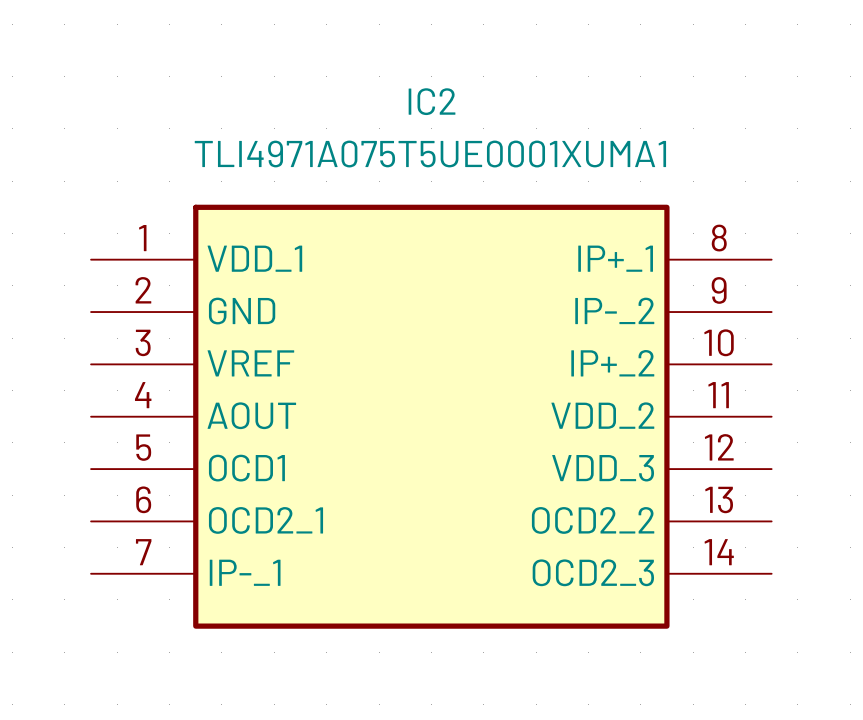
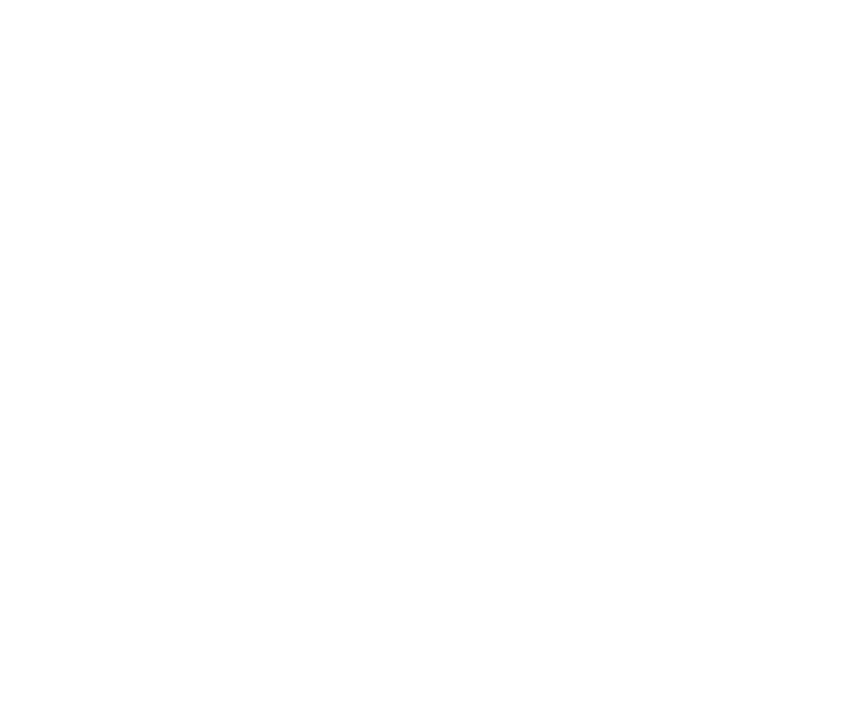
IC2: TLI4971A075T5UE0001XUMA1 (431, 416) -> none

